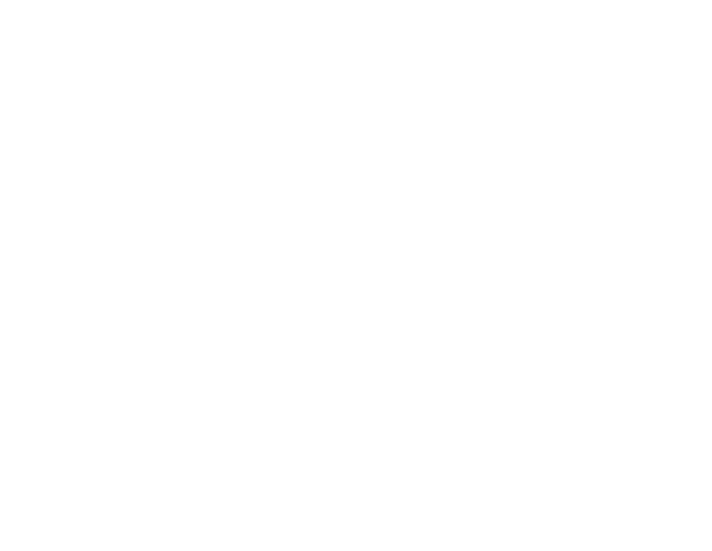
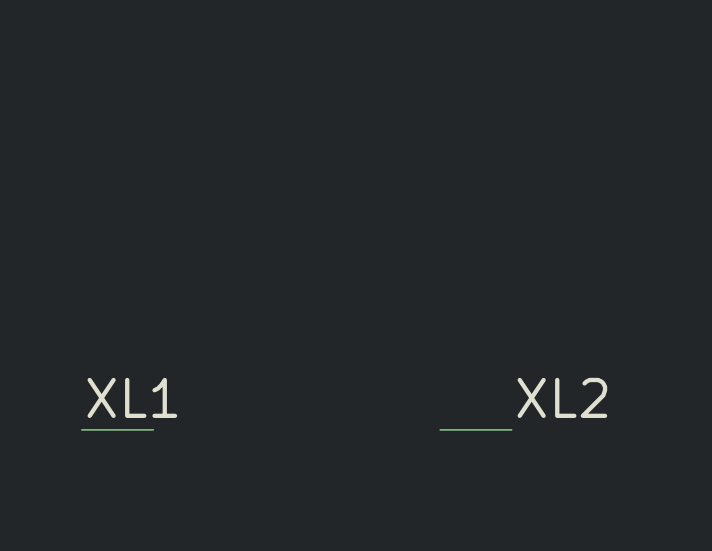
label: none -> XL1 (132, 397)
label: none -> XL2 (562, 397)
wire: none -> (81, 429) (153, 429)
wire: none -> (440, 429) (511, 429)

